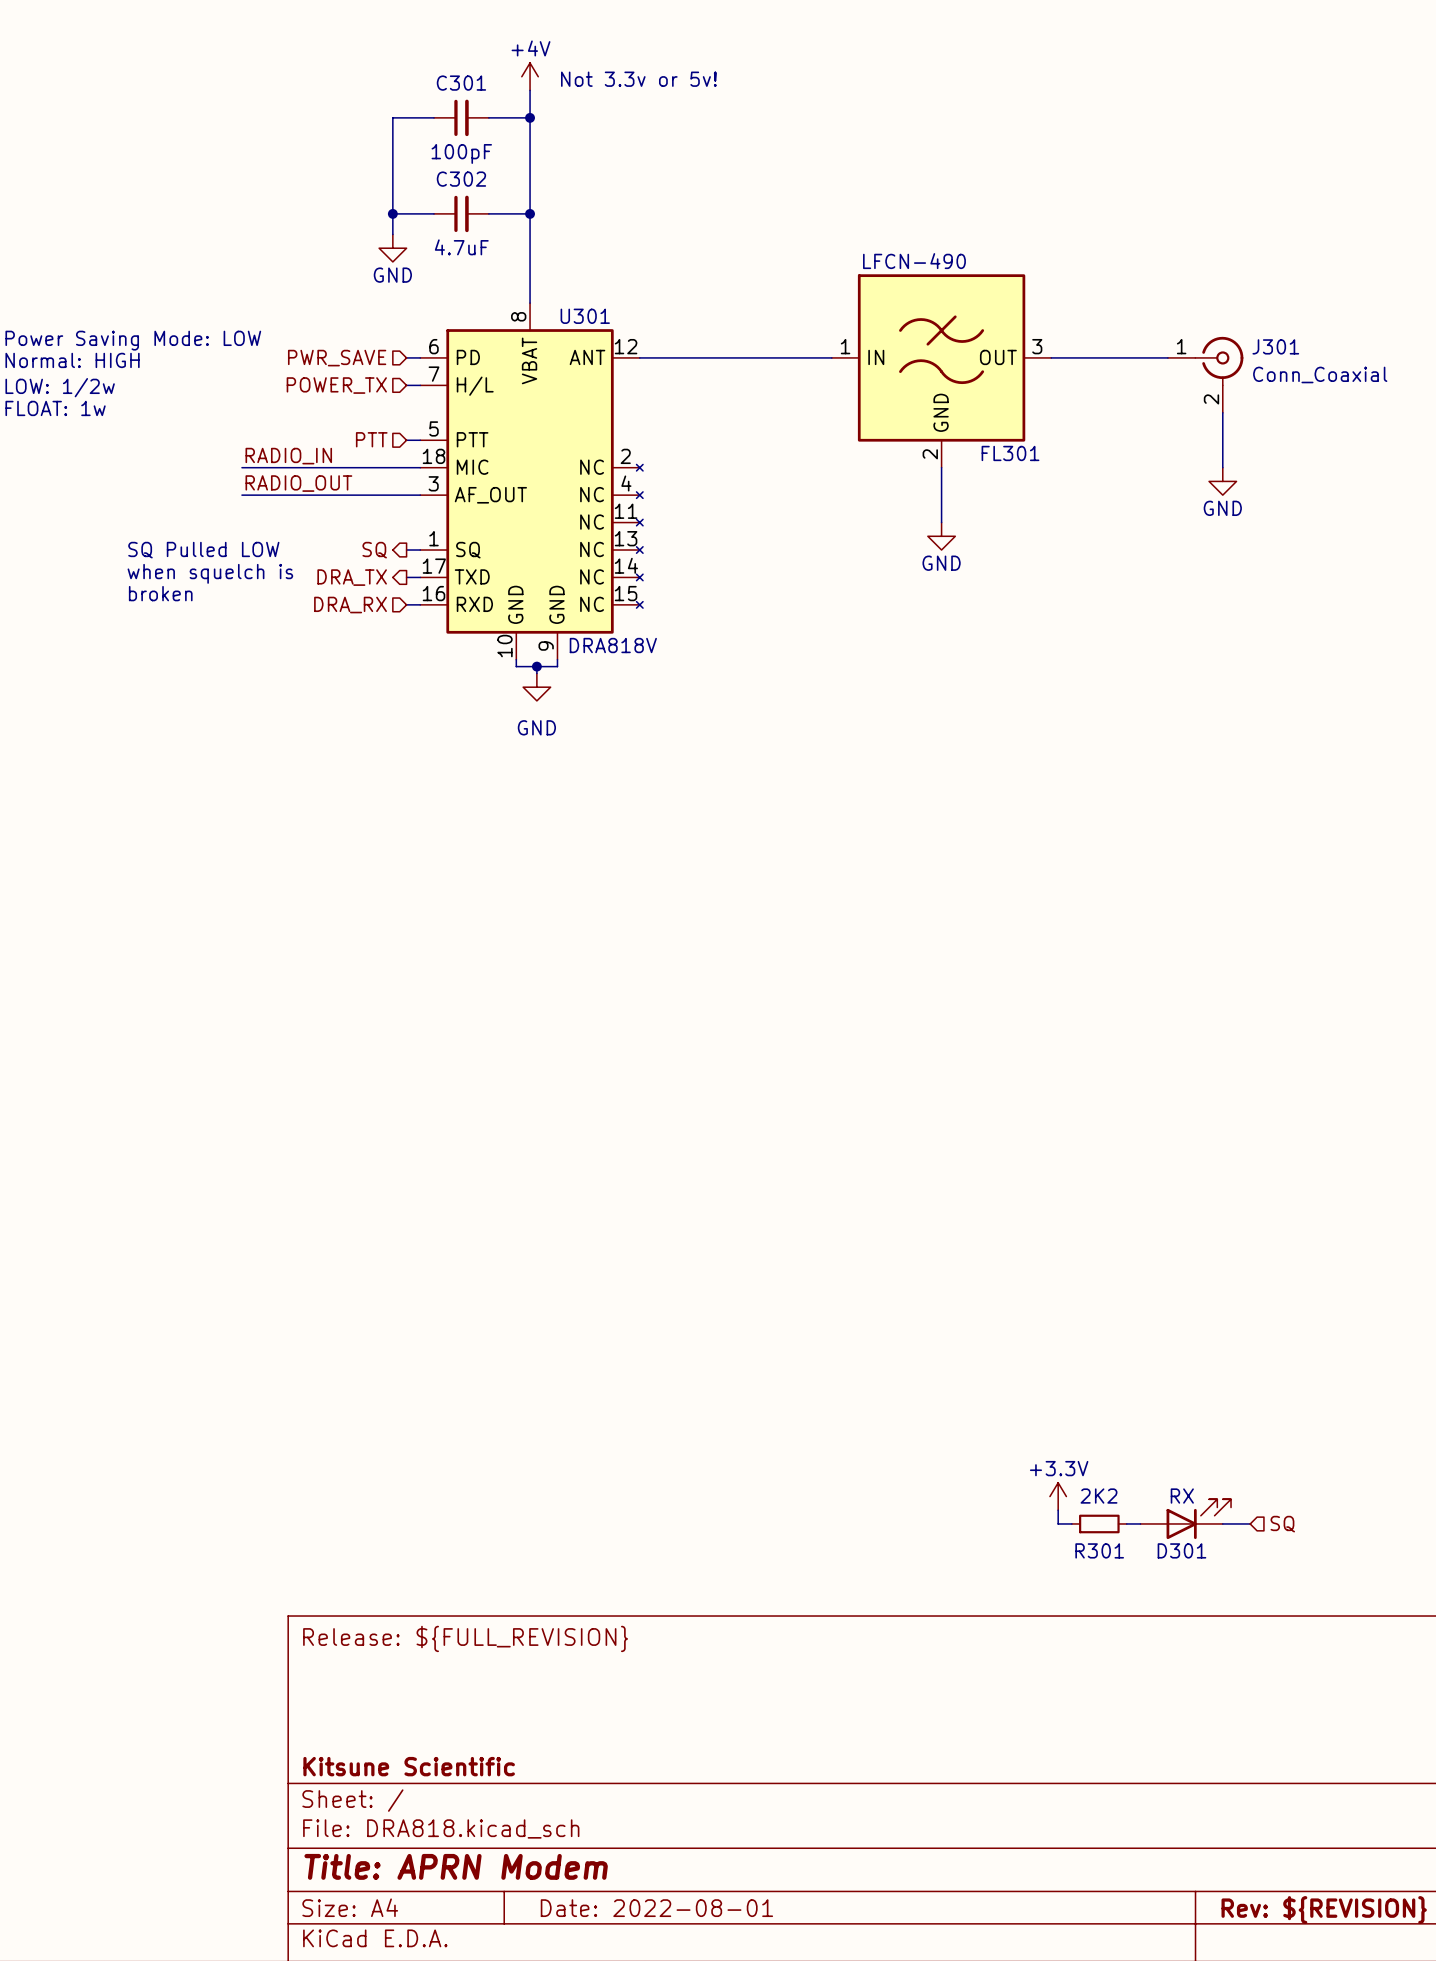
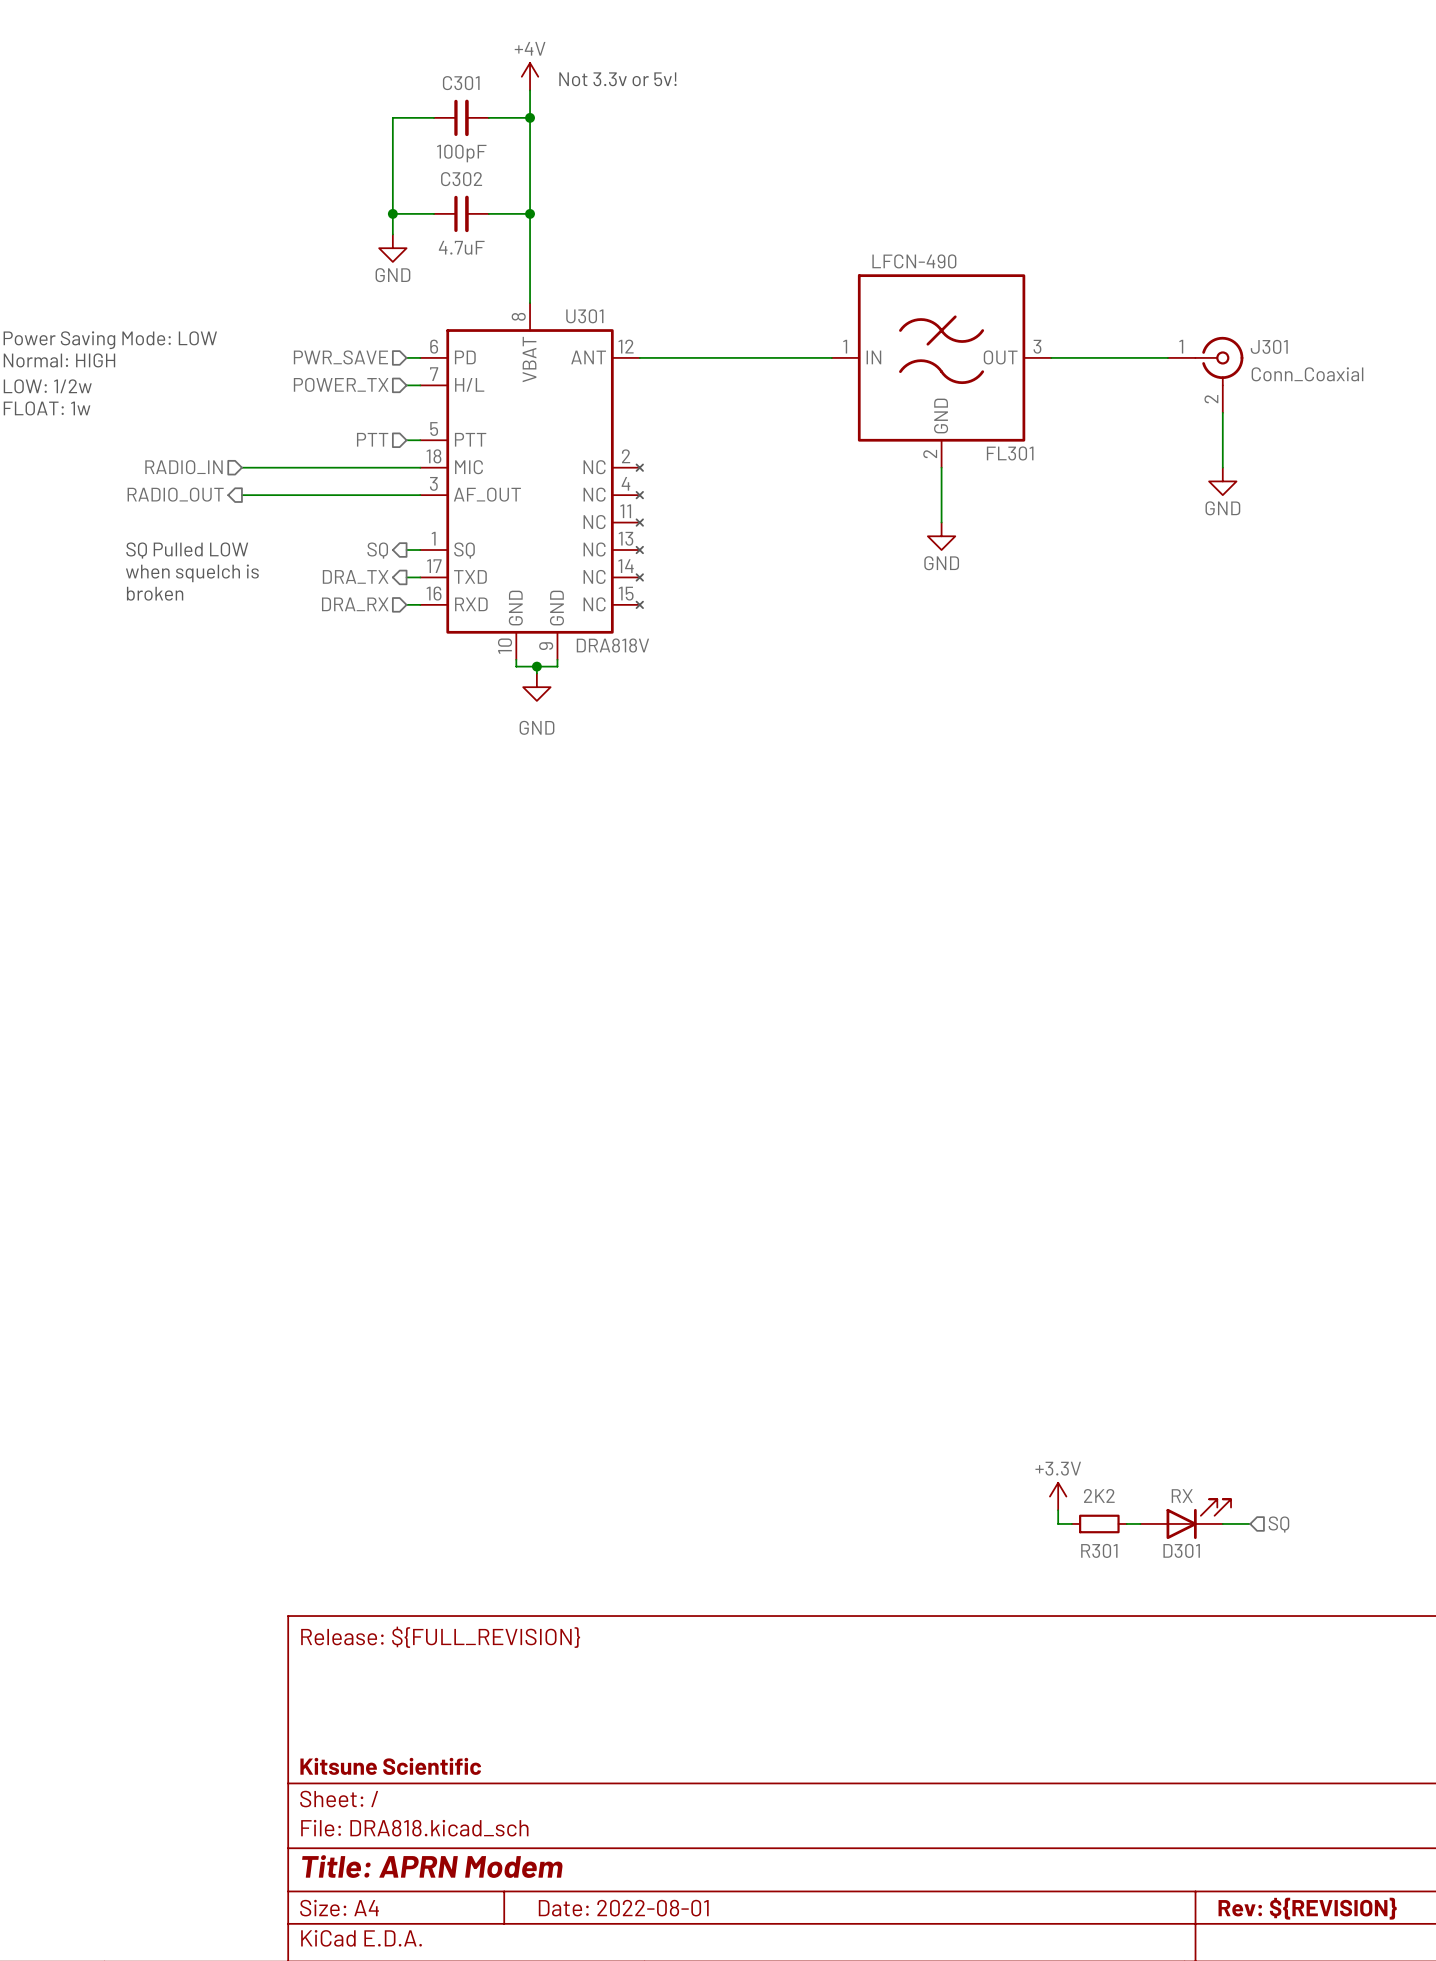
label: RADIO_IN (288, 456) -> none
hierarchical label: none -> RADIO_IN (184, 467)
label: RADIO_OUT (298, 483) -> none
hierarchical label: none -> RADIO_OUT (175, 494)

